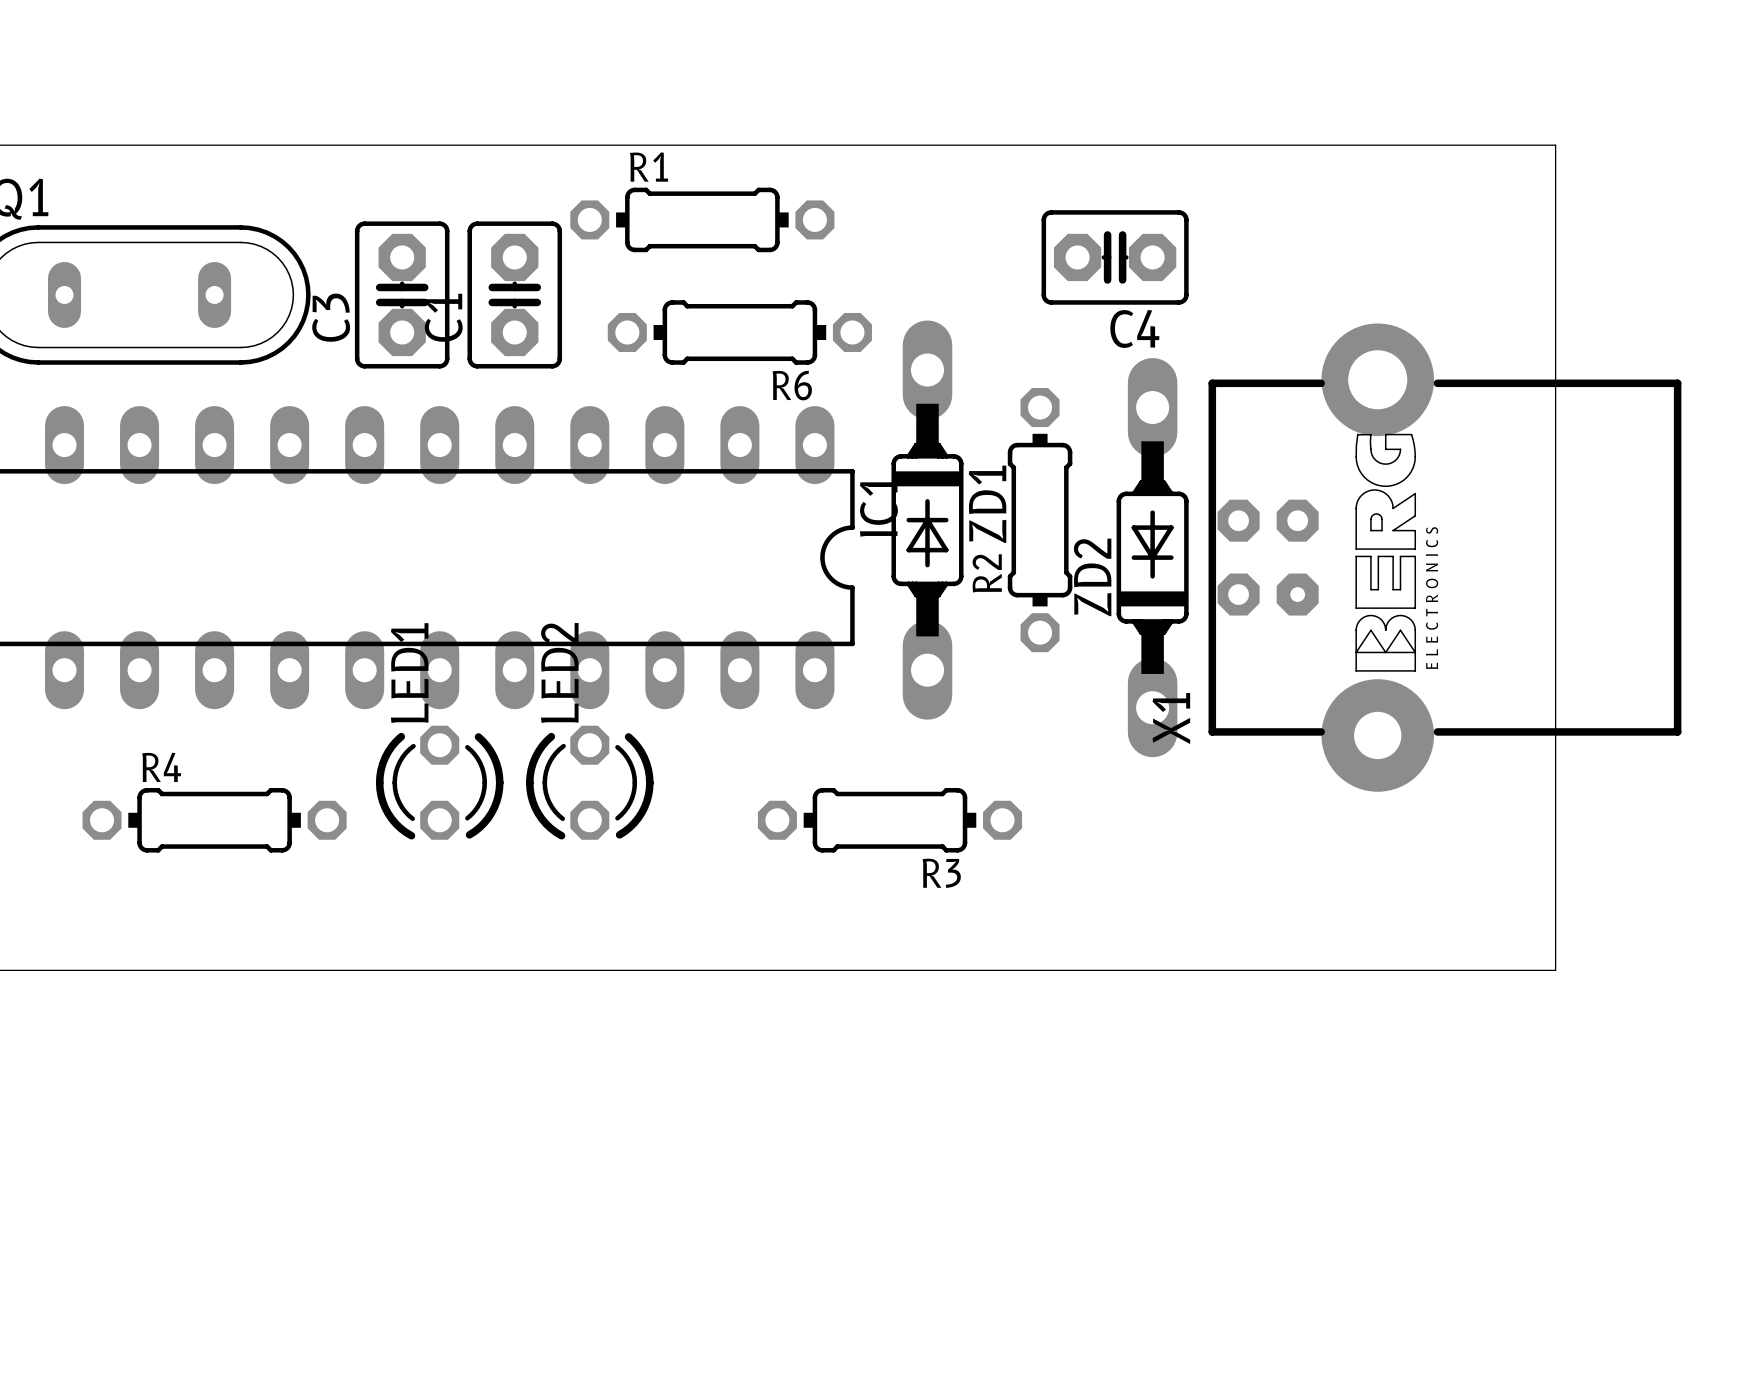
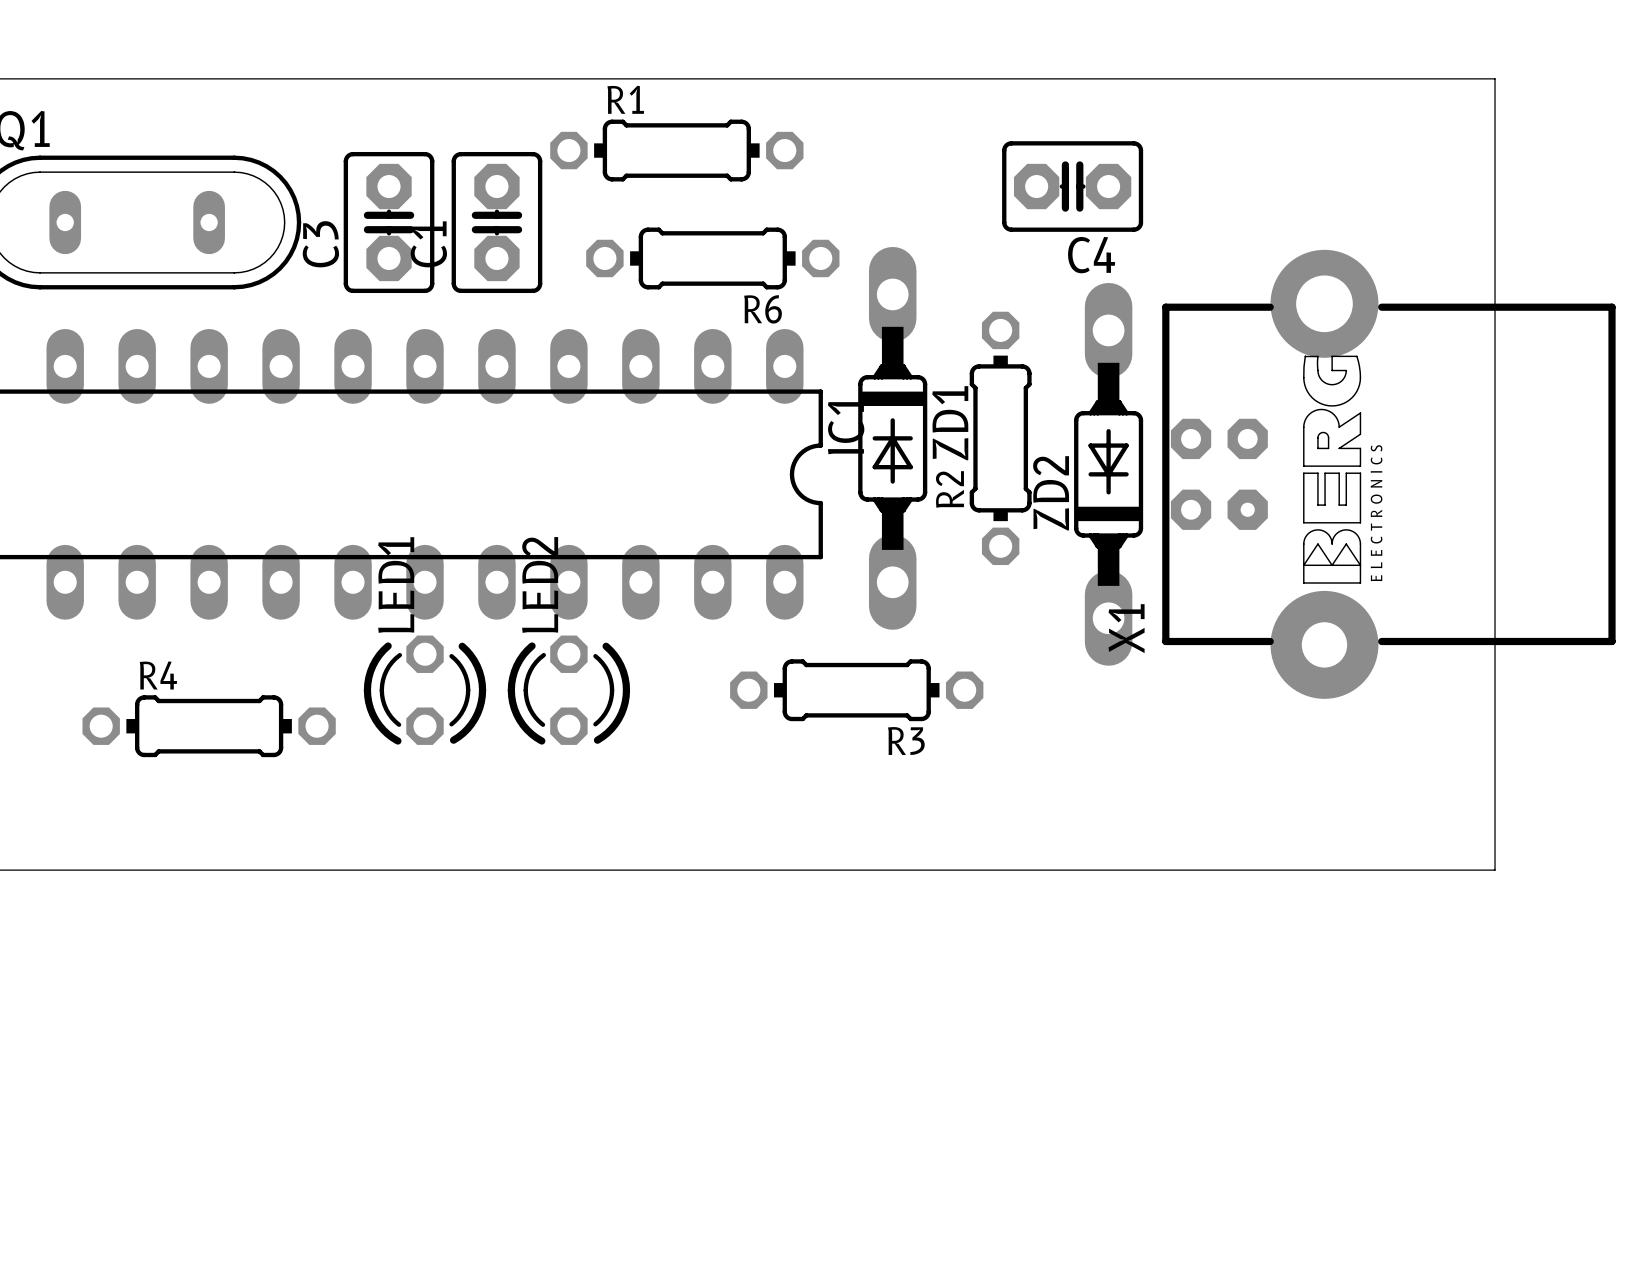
R3 position: (889, 820) -> (856, 690)

